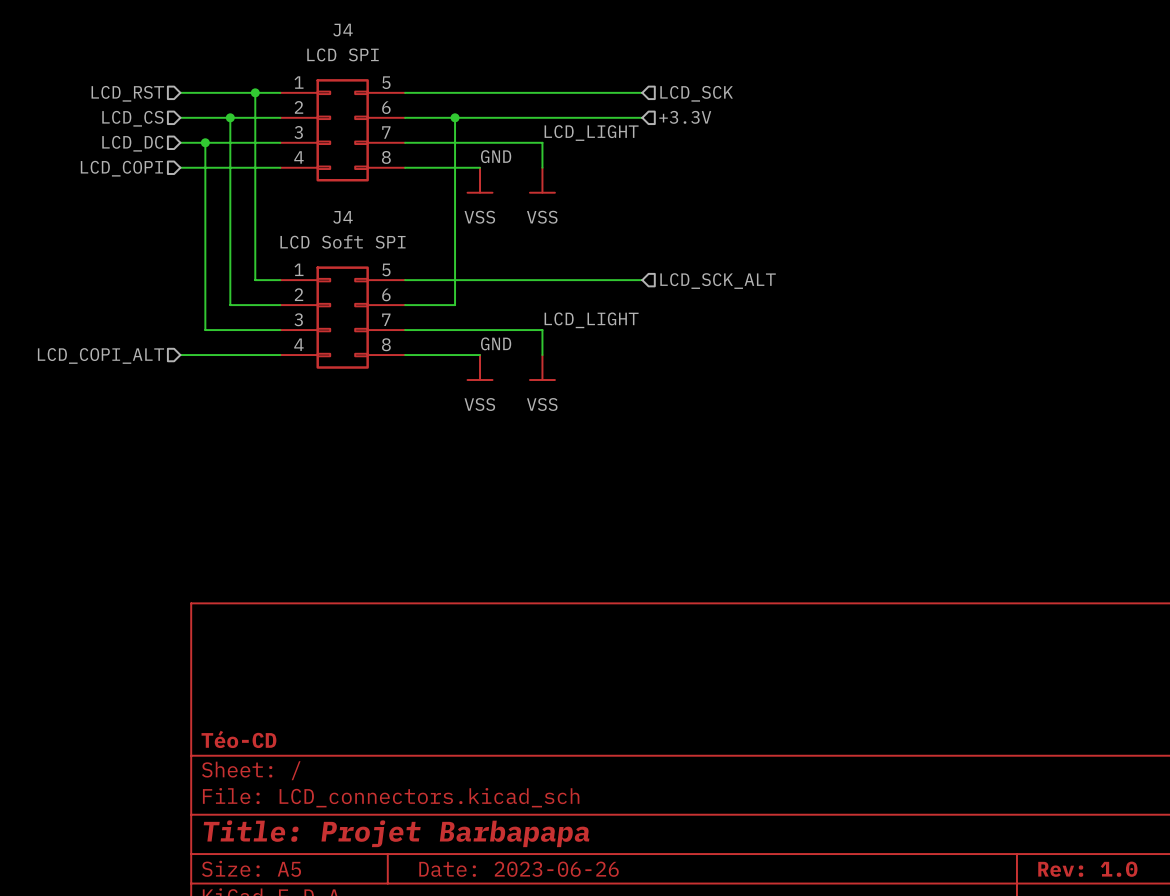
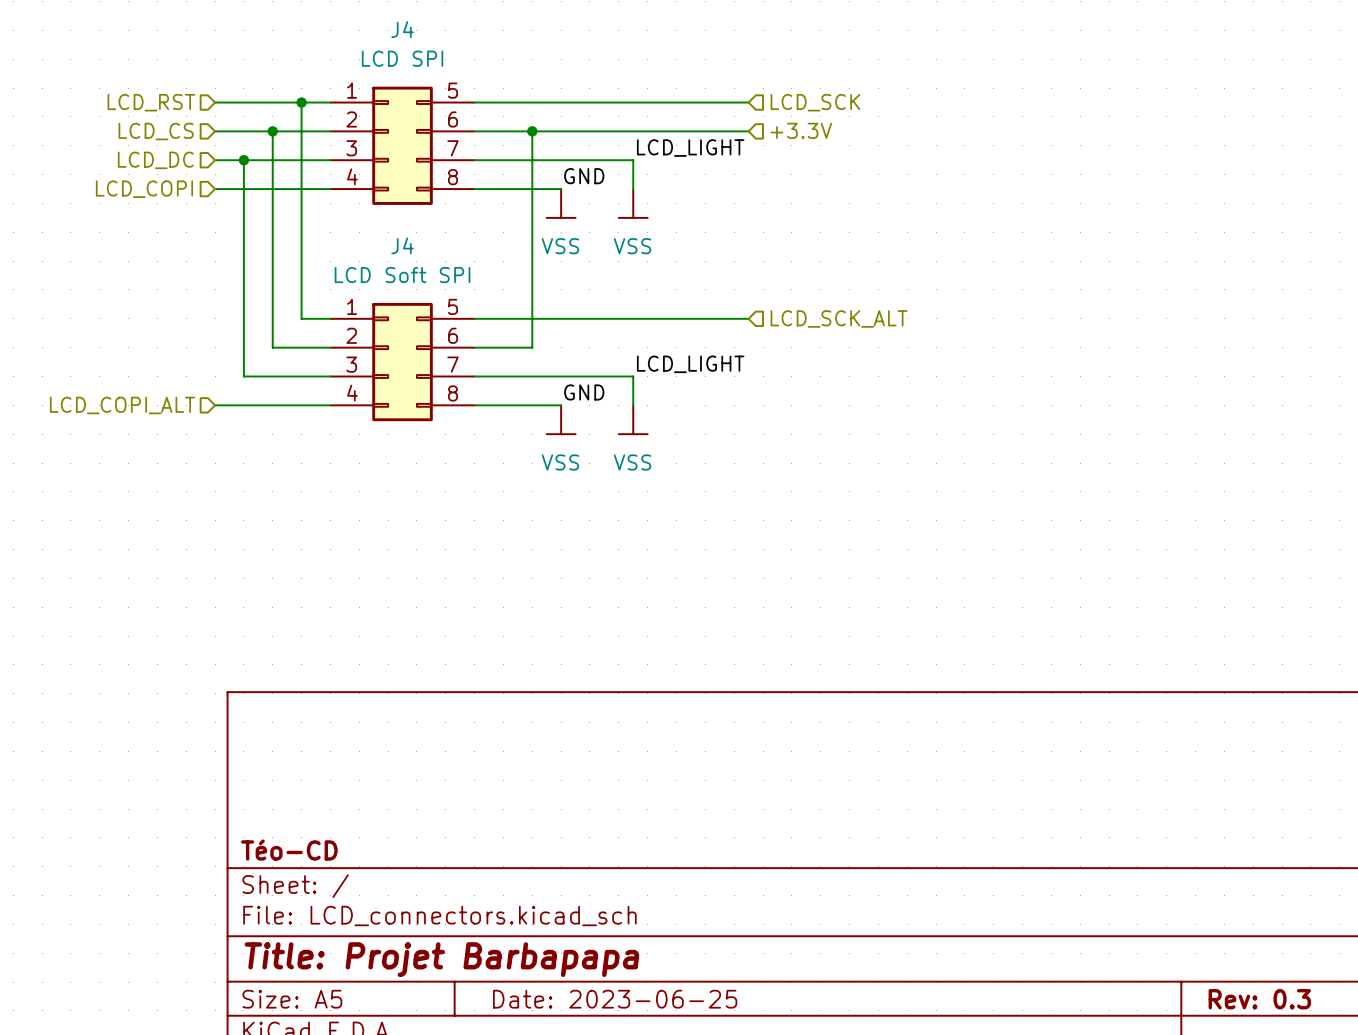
title block: Date: 2023-06-26 (519, 869) -> Date: 2023-06-25 (615, 999)
title block: Rev: 1.0 (1087, 869) -> Rev: 0.3 (1259, 999)

